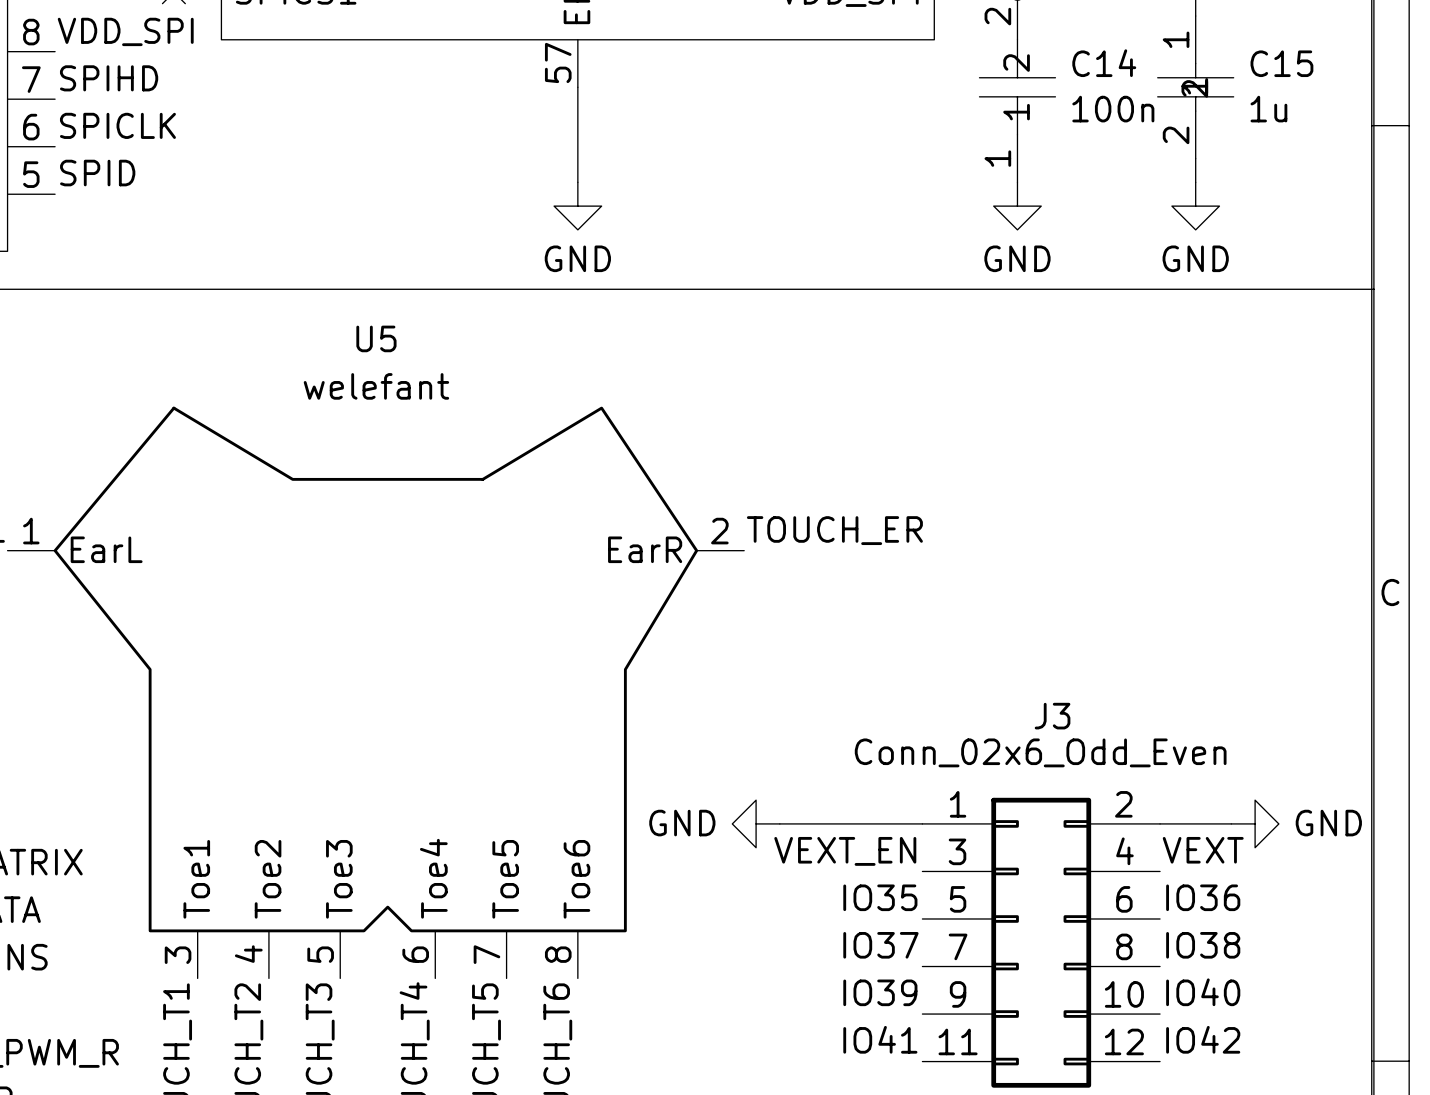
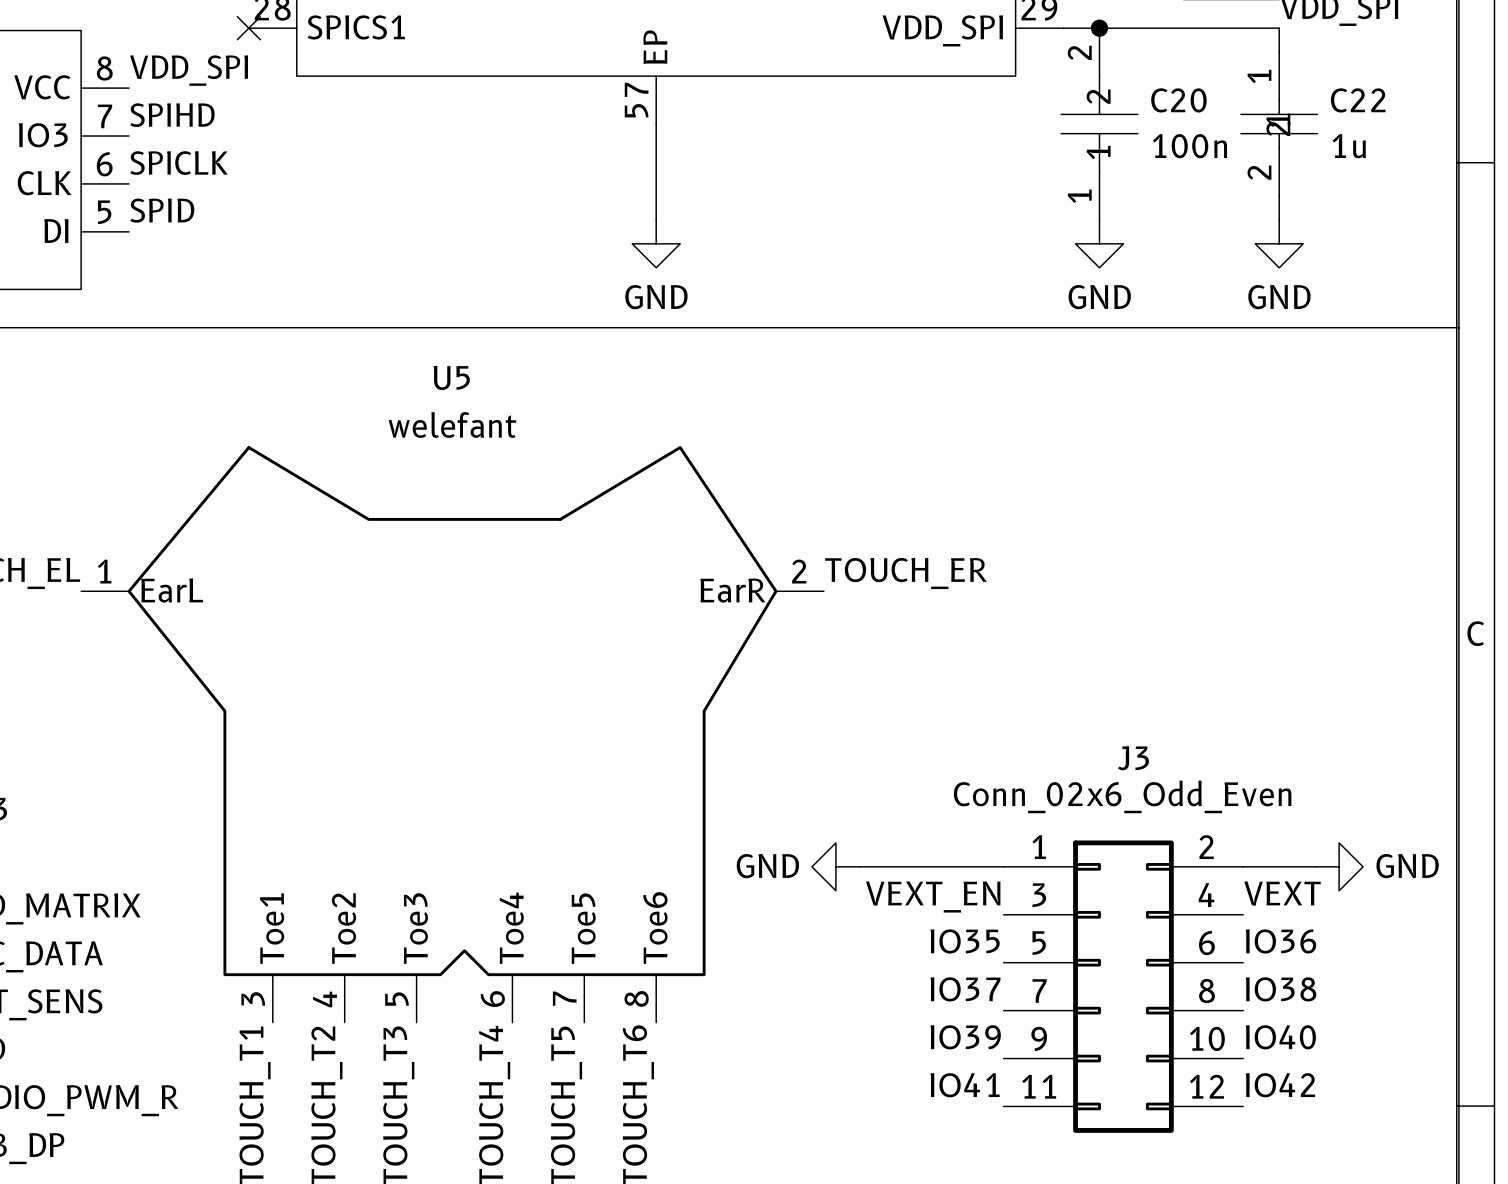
C14 name: C14 (1104, 63) -> C20 (1178, 100)
C15 name: C15 (1281, 63) -> C22 (1358, 100)

